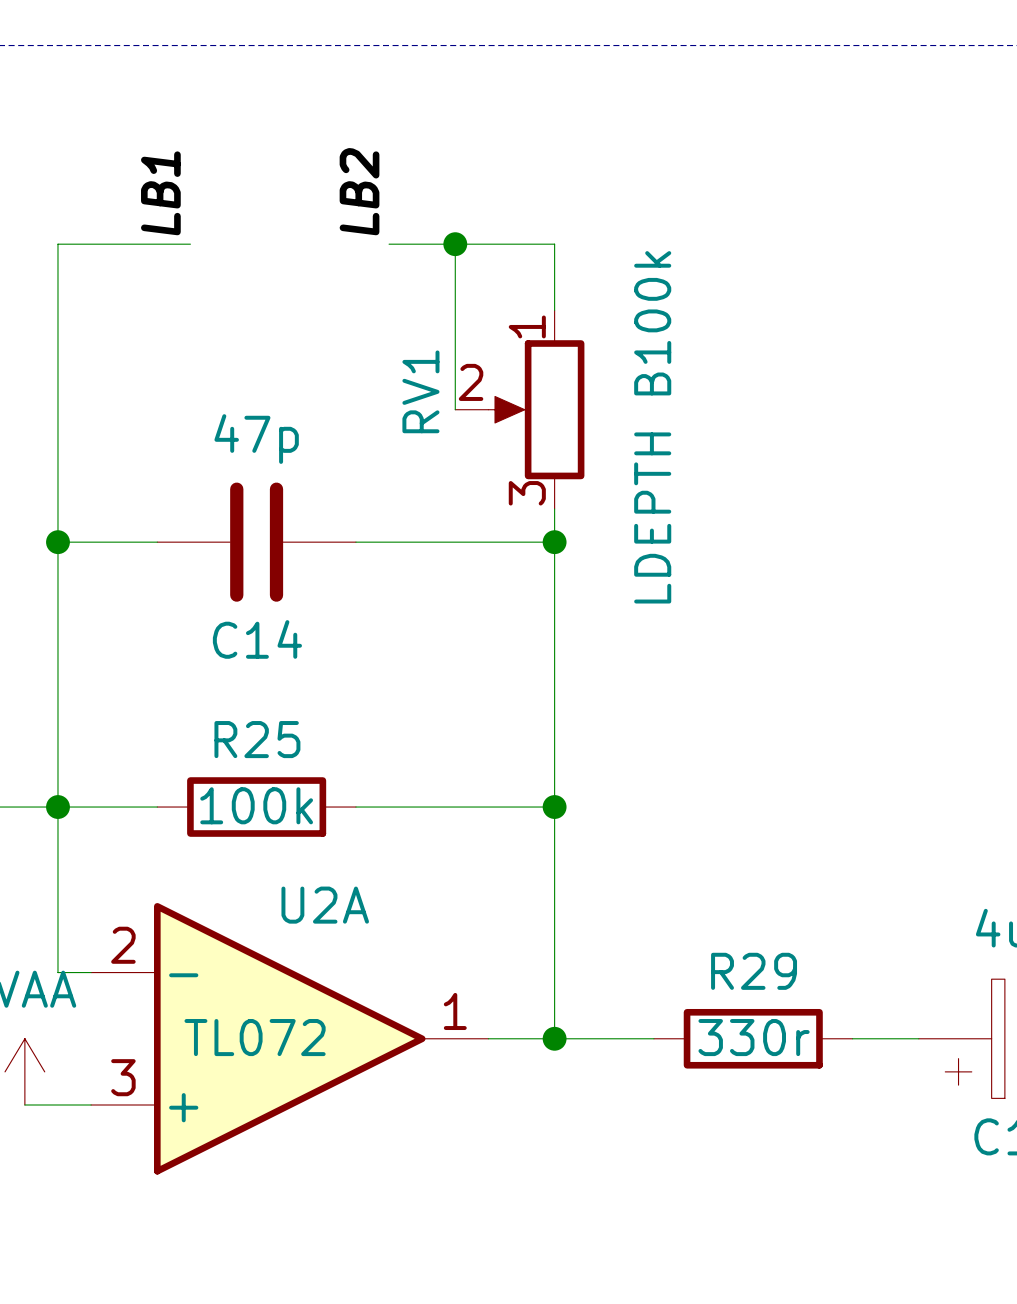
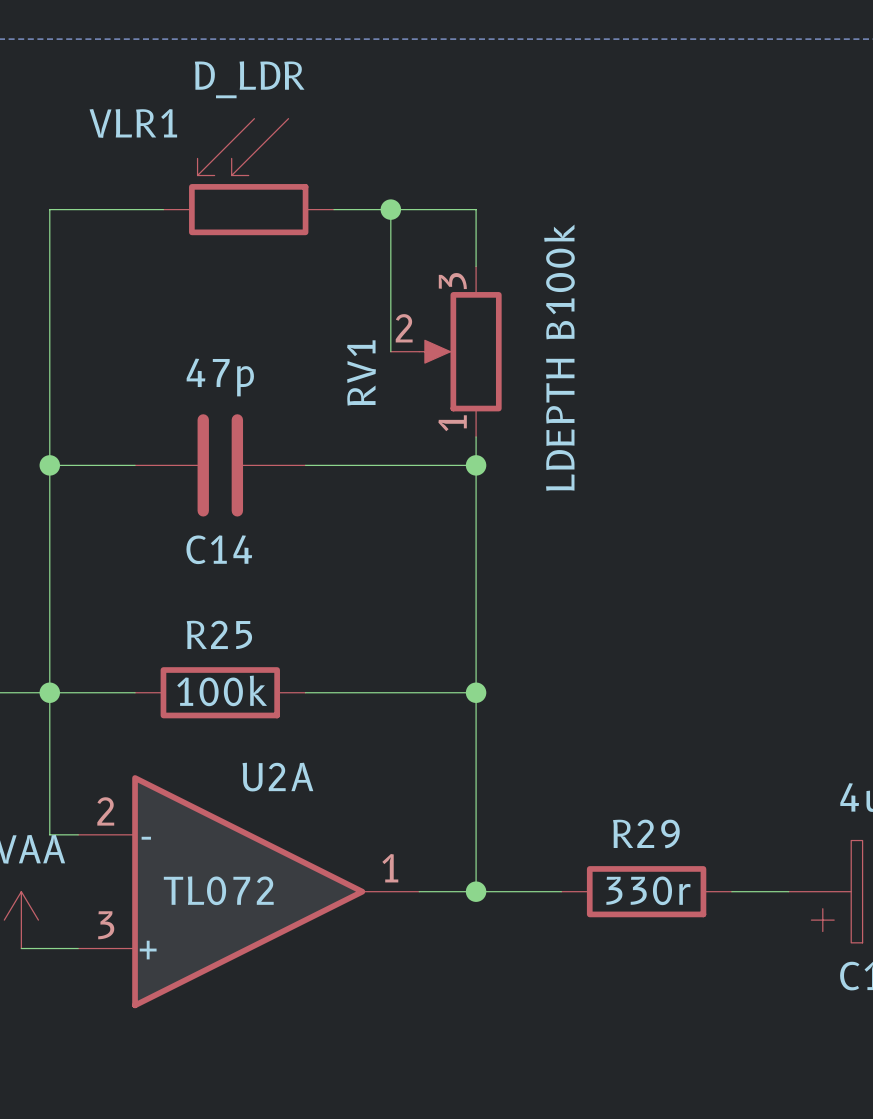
label: LB2 (359, 191) -> none
label: LB1 (160, 193) -> none
VLR1: none -> D_LDR (248, 176)
RV1 flip: as is (536, 409) -> up-down (460, 351)

